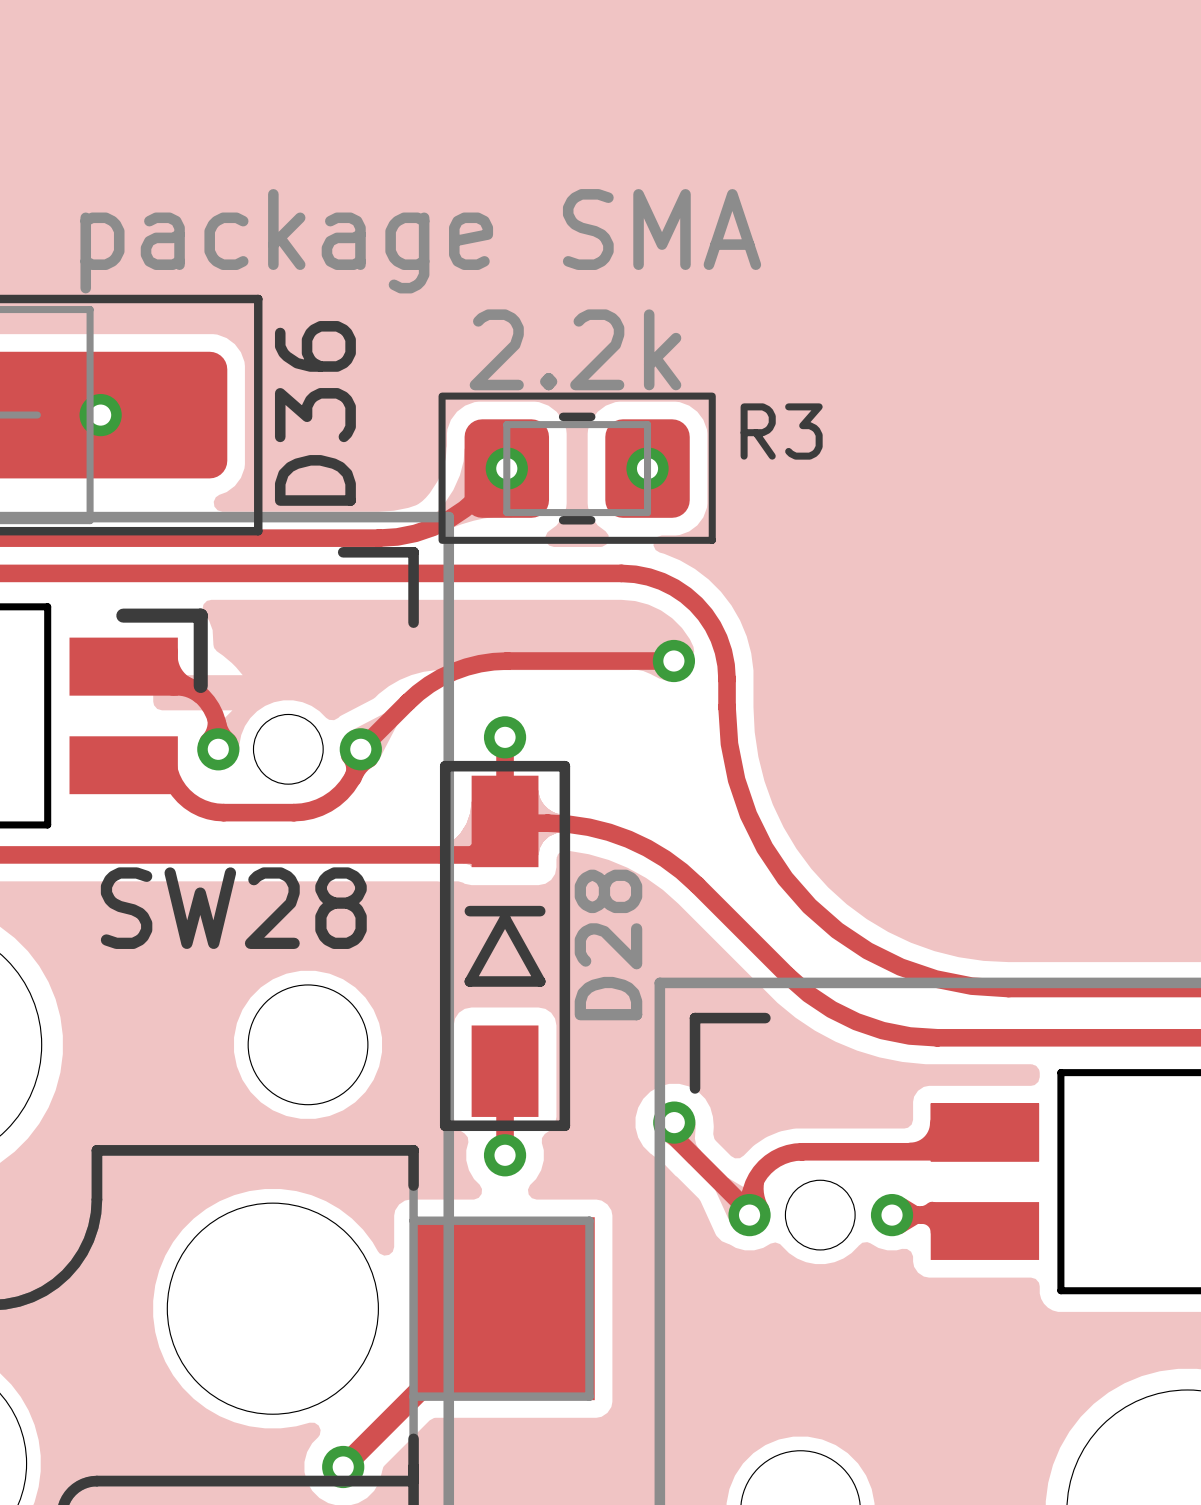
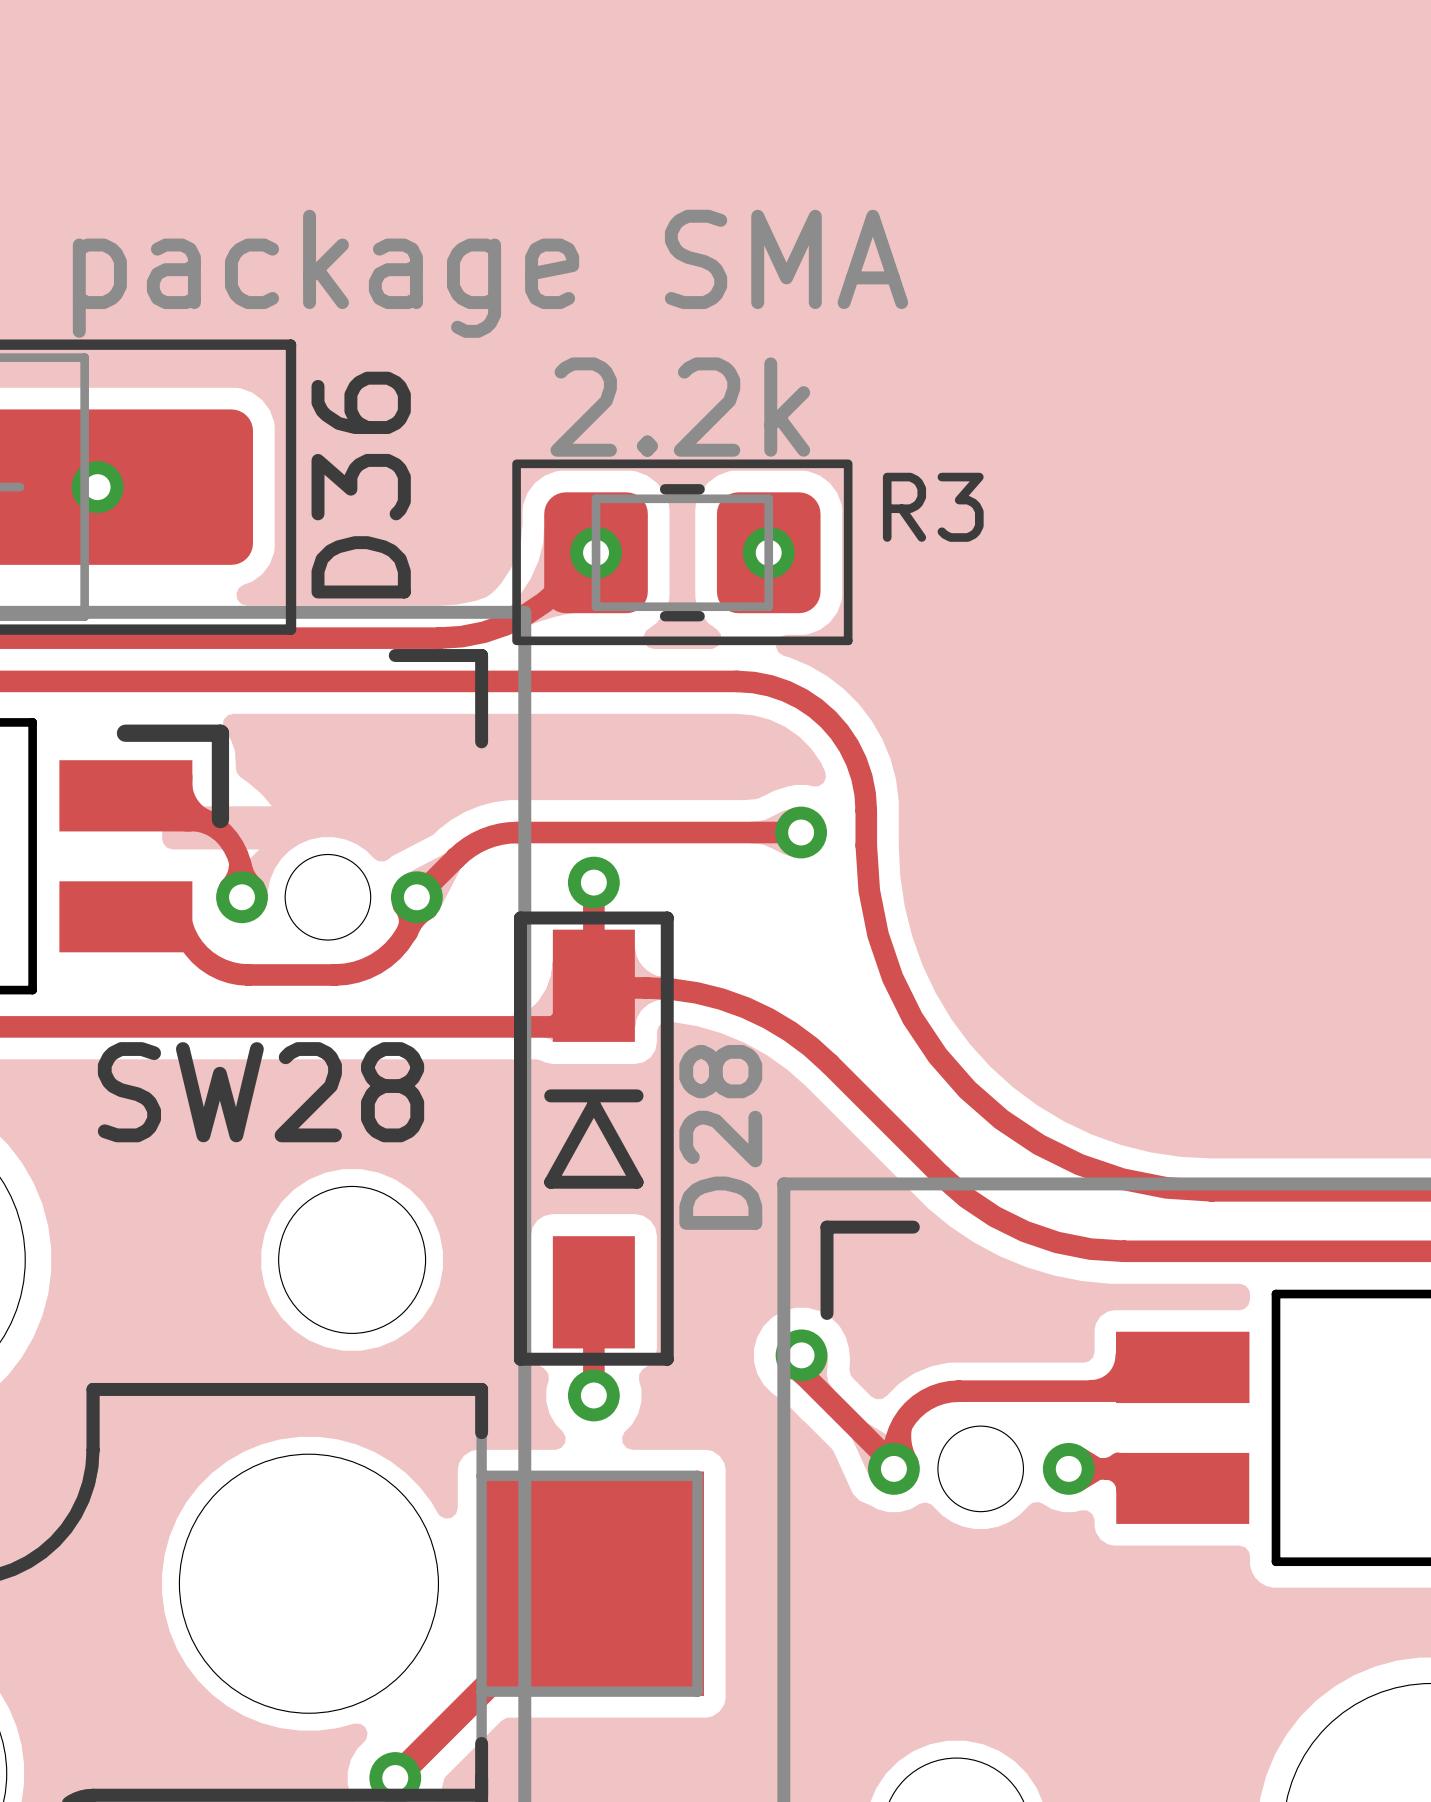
track: (673, 661) (507, 661) (479, 663) (453, 671) (429, 684) (392, 717) -> (801, 832) (508, 832) (492, 836) (476, 842) (456, 857)
via position: (673, 661) -> (801, 832)

